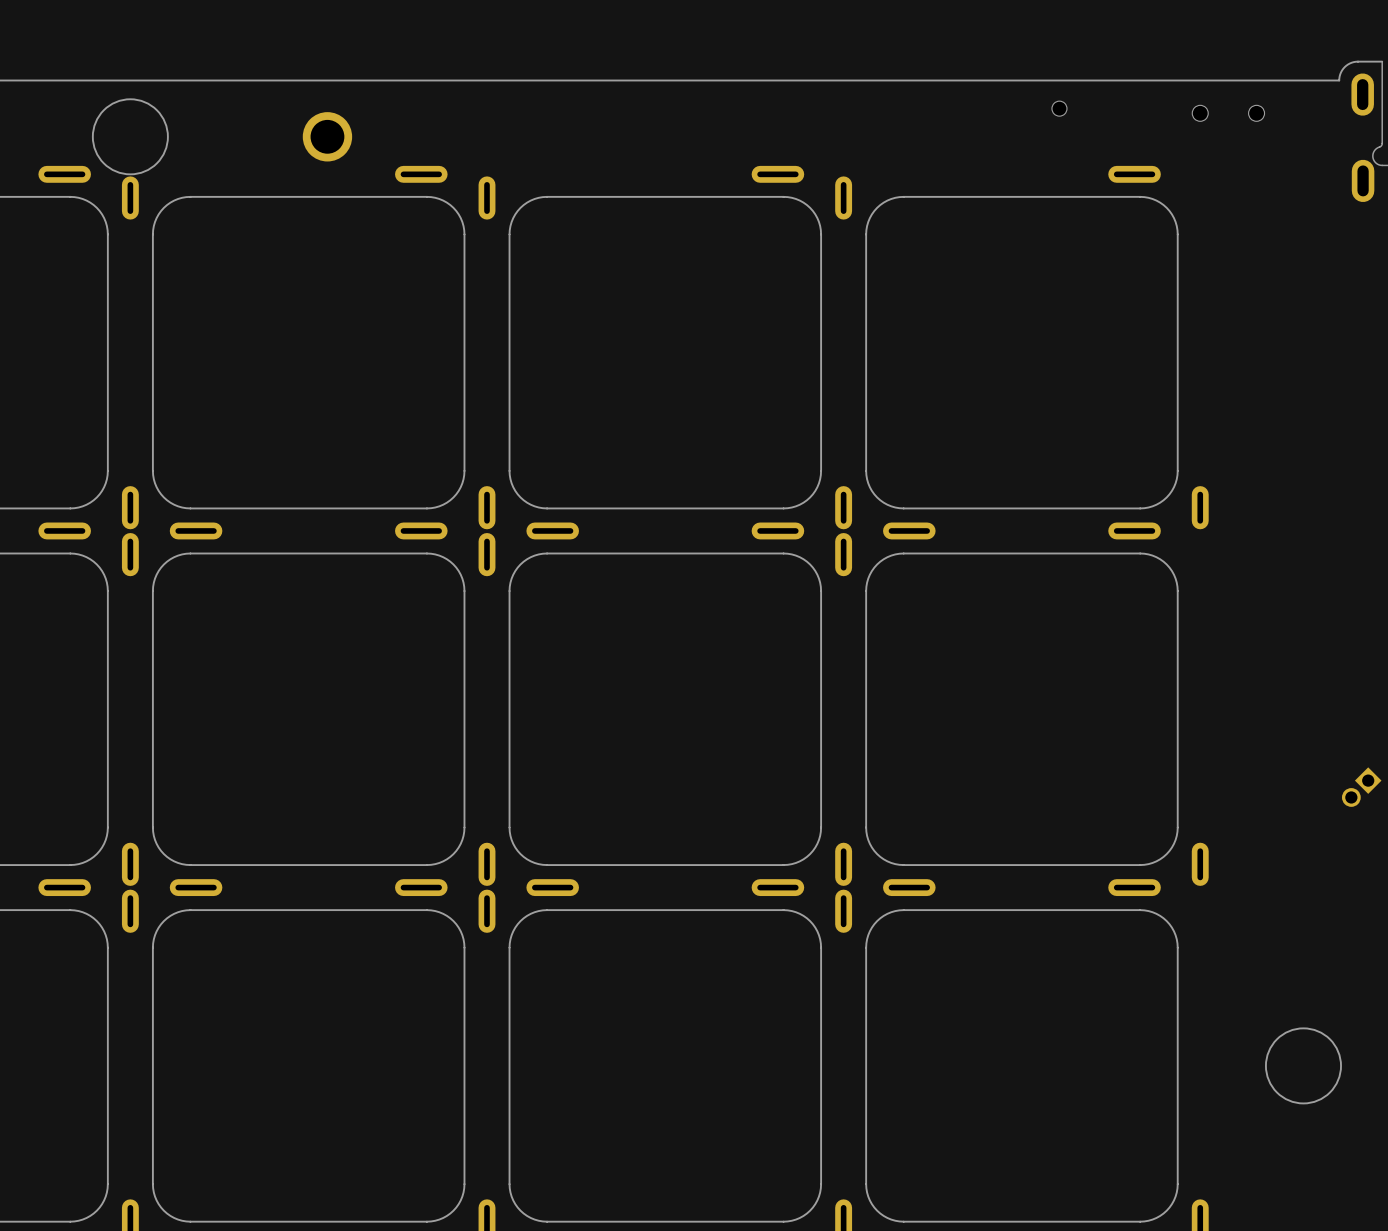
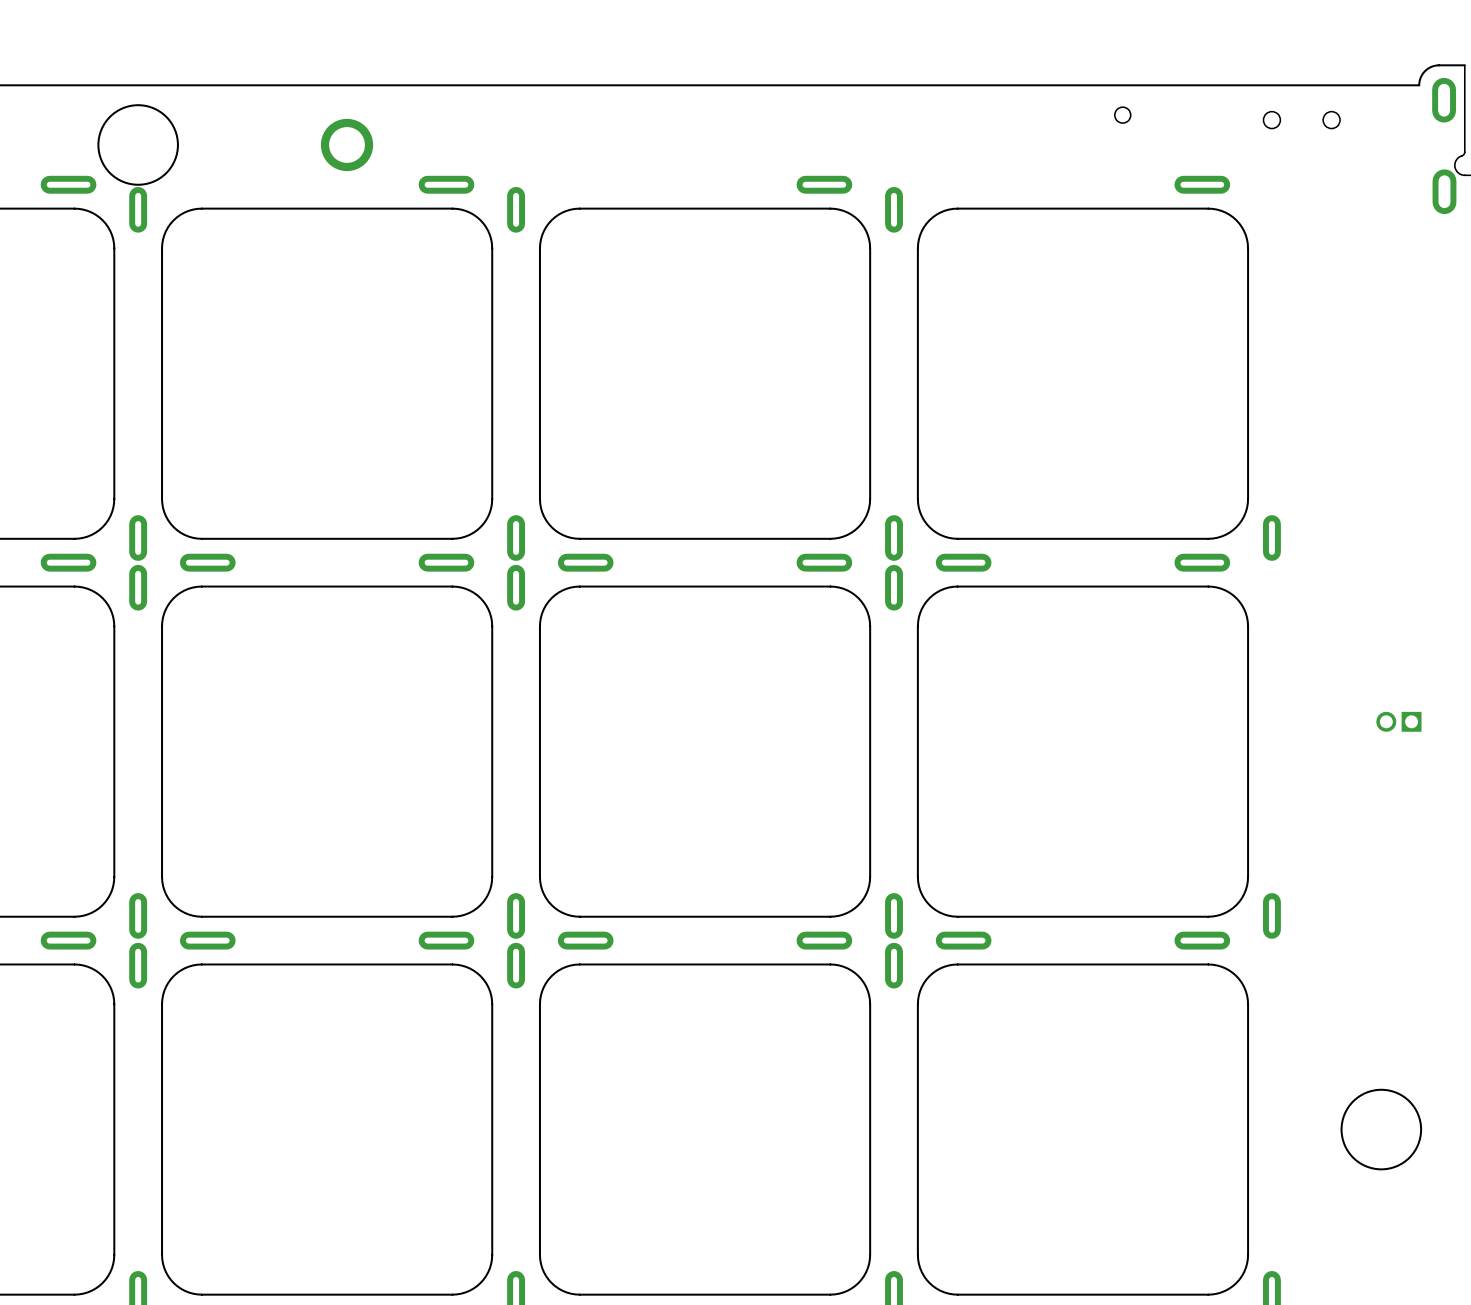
part: none -> (1398, 721)
part: (1361, 787) -> none

